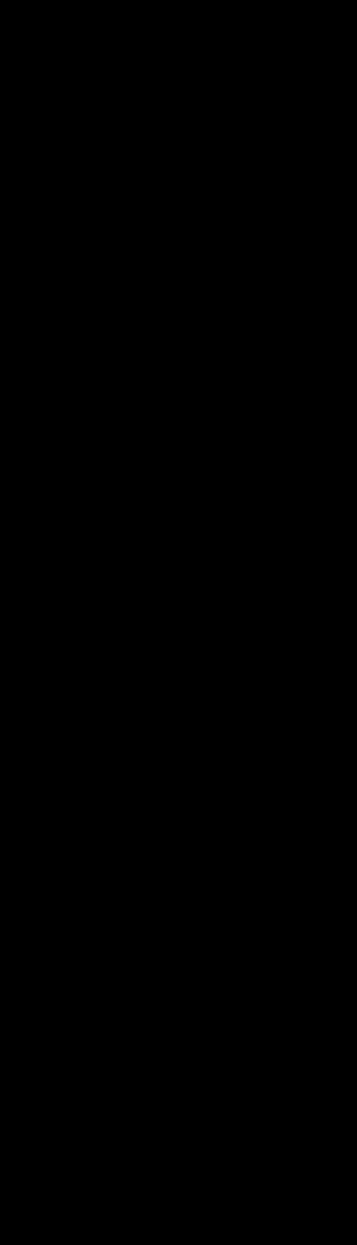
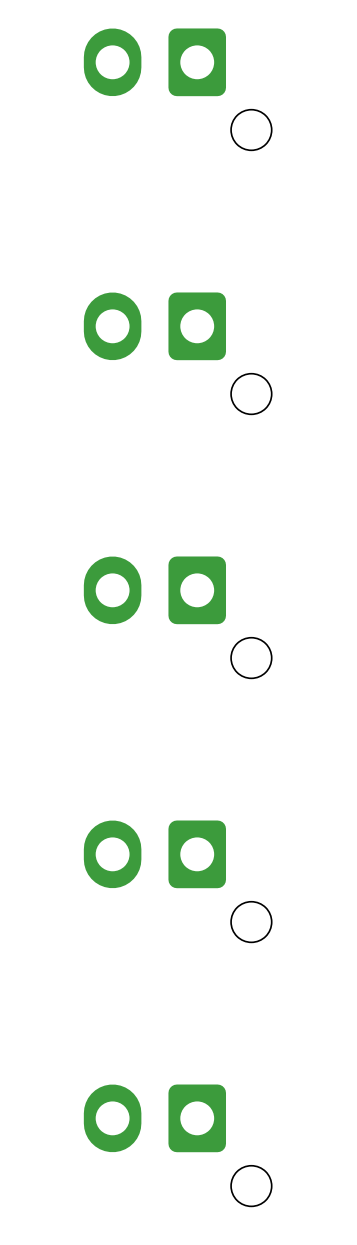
part: none -> (177, 89)
part: none -> (177, 353)
part: none -> (177, 617)
part: none -> (177, 881)
part: none -> (177, 1145)

